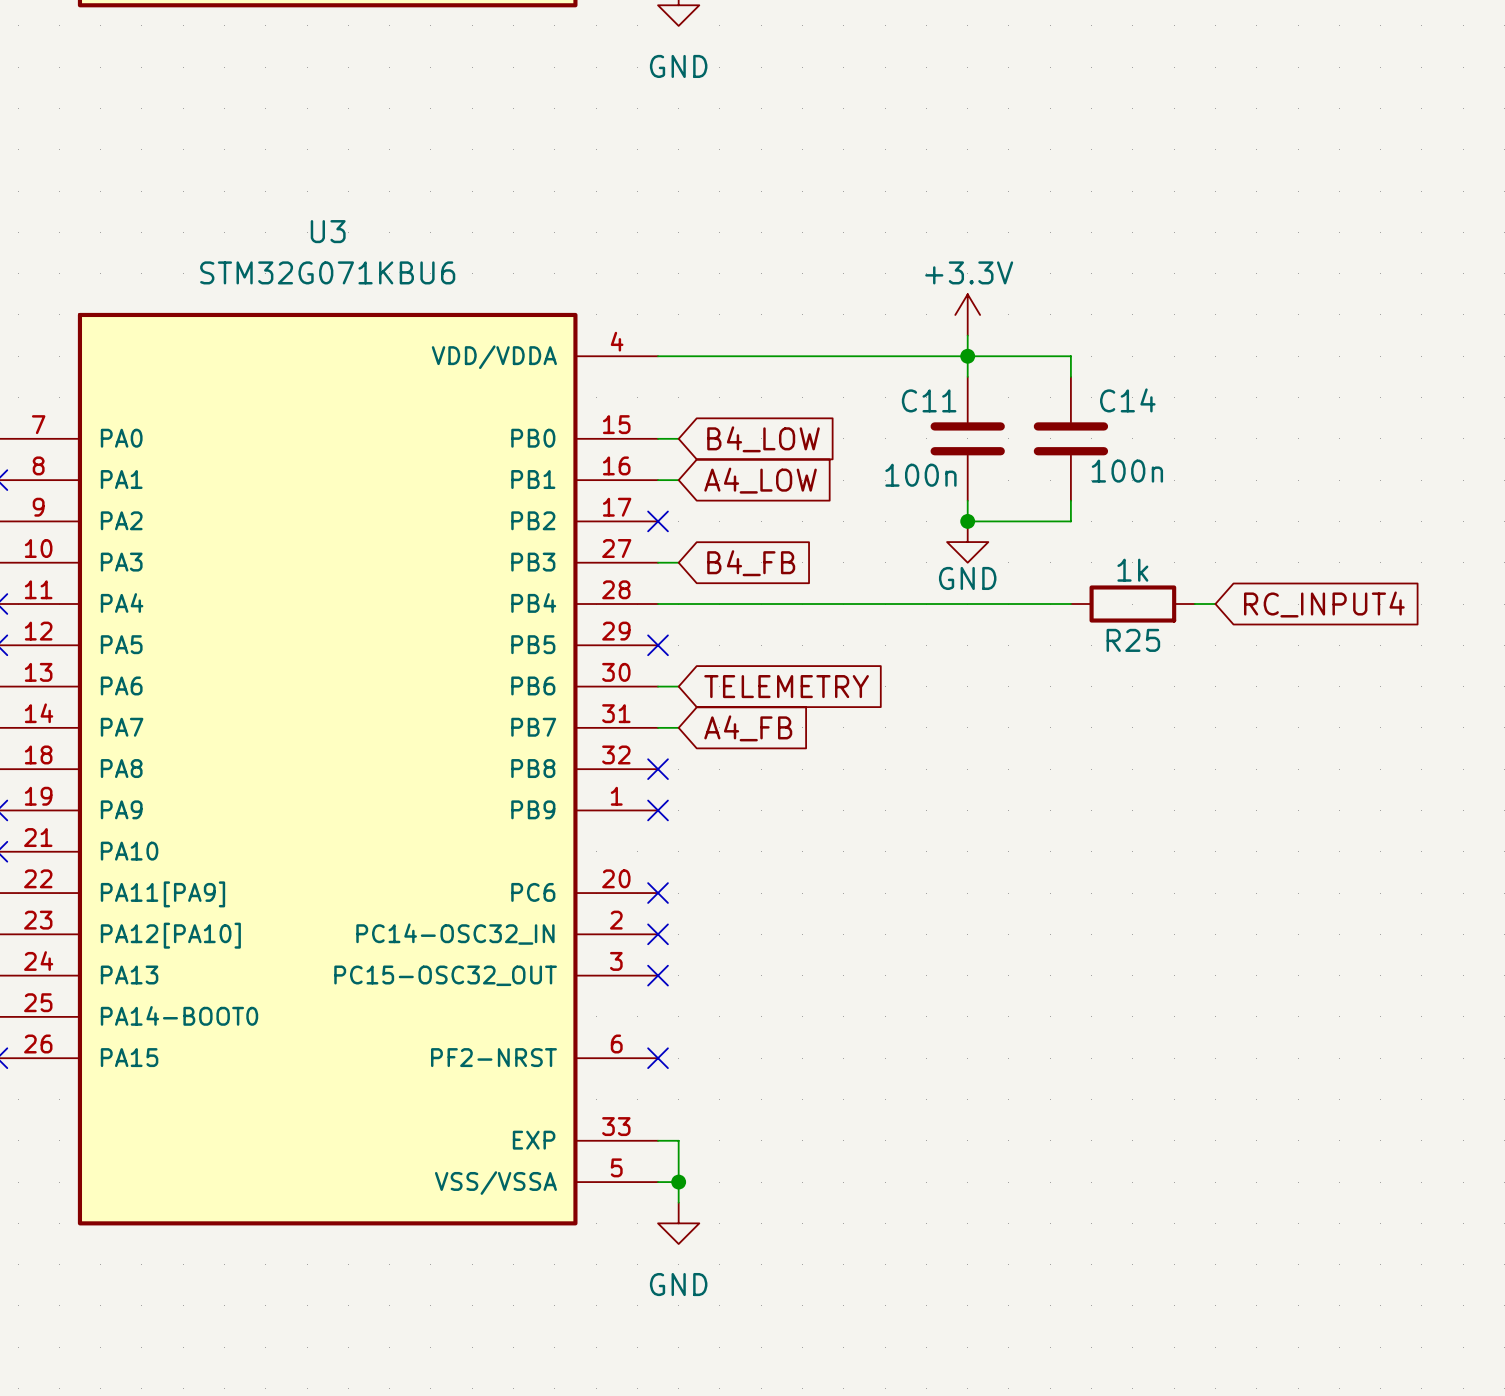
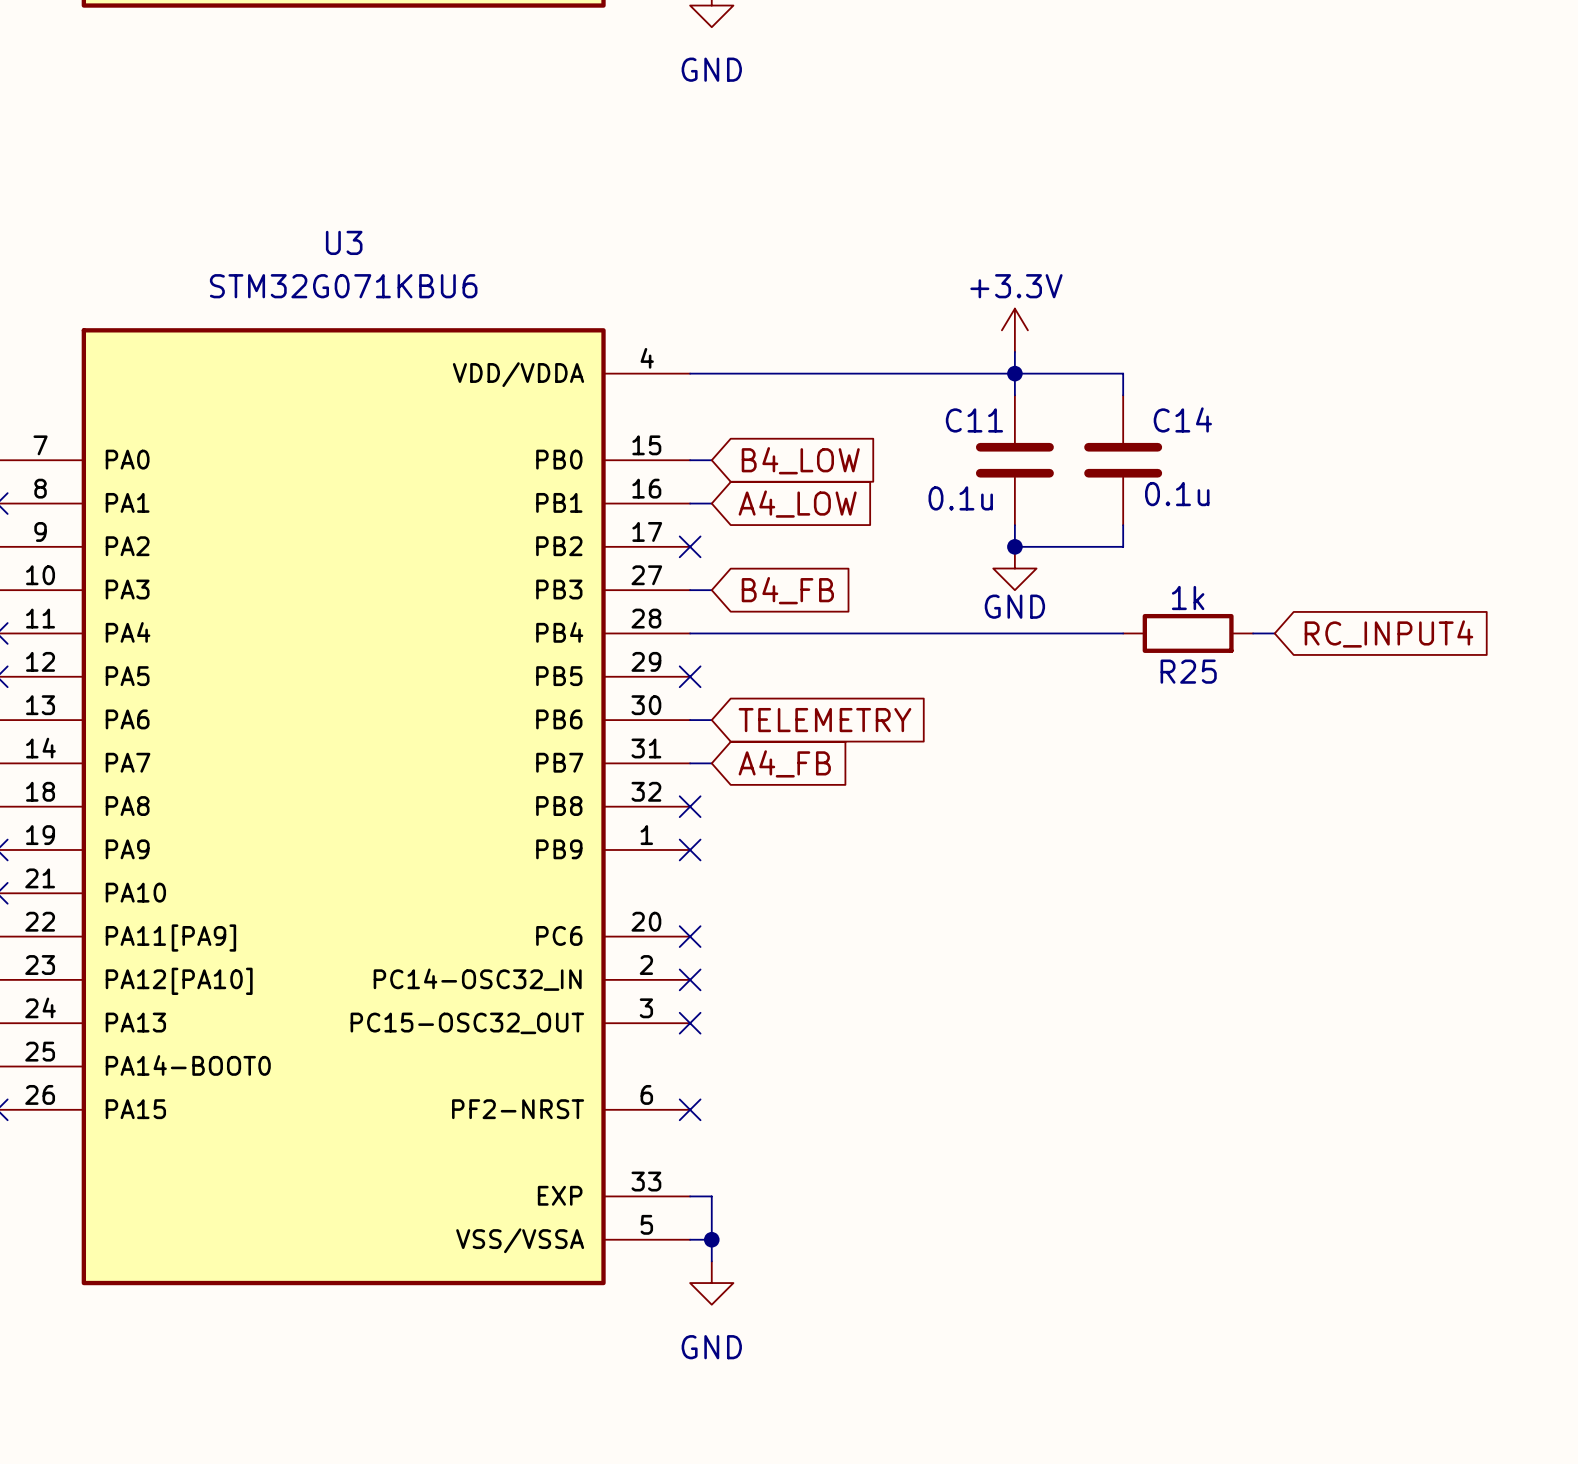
C14 value: 100n (1127, 471) -> 0.1u (1177, 494)
C11 value: 100n (920, 475) -> 0.1u (960, 498)

